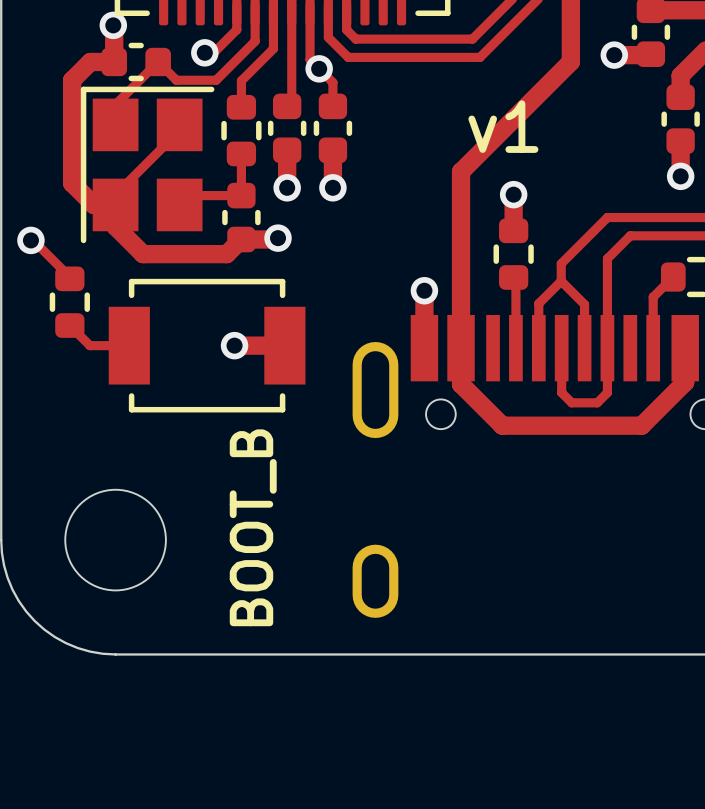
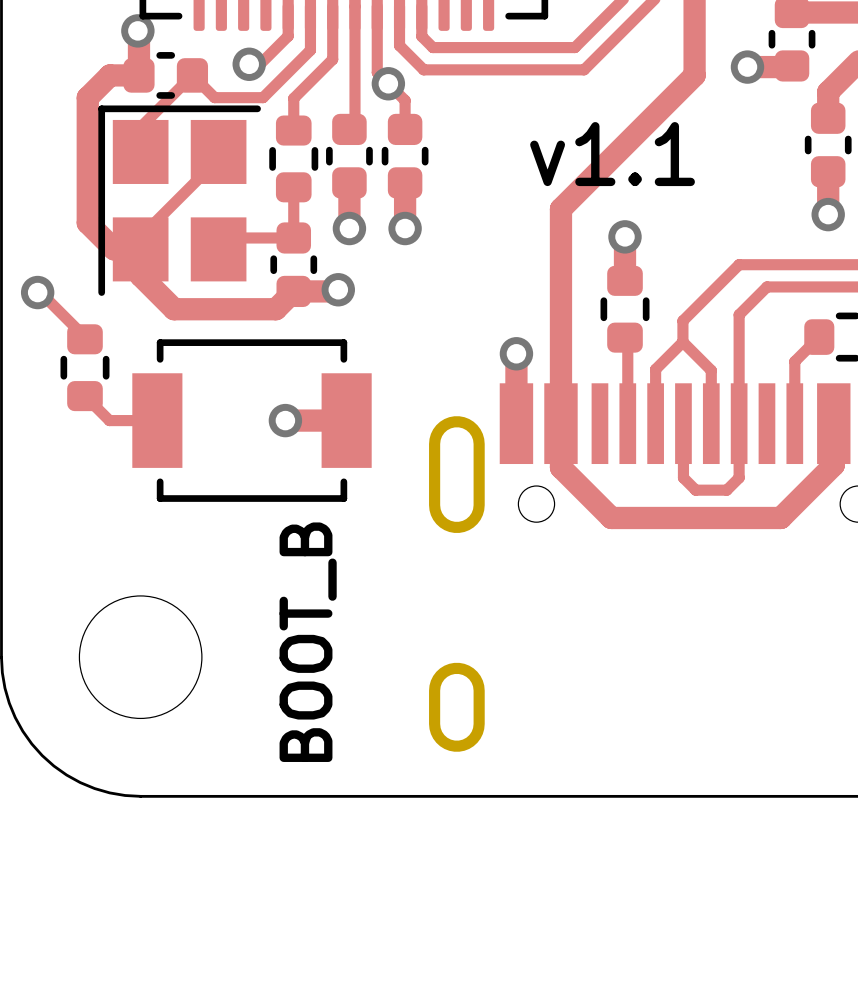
text: v1 (503, 126) -> v1.1 (612, 154)

